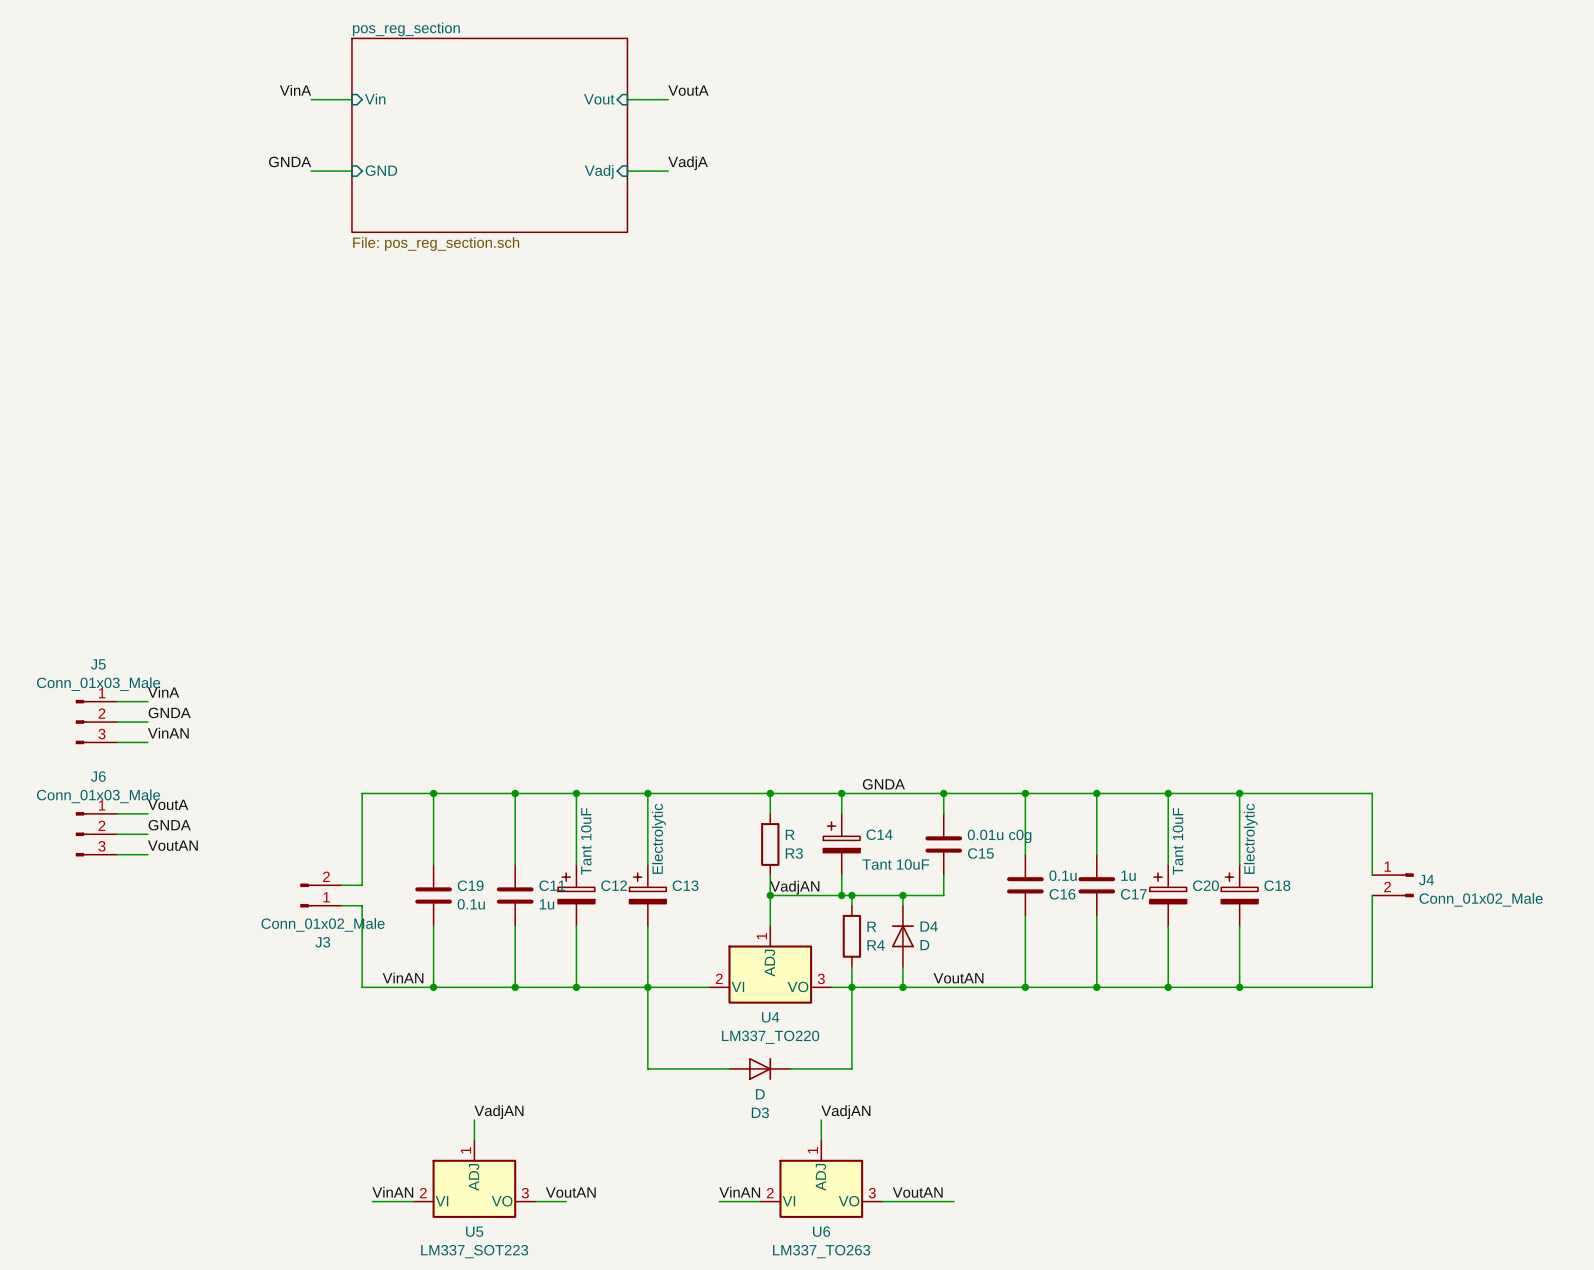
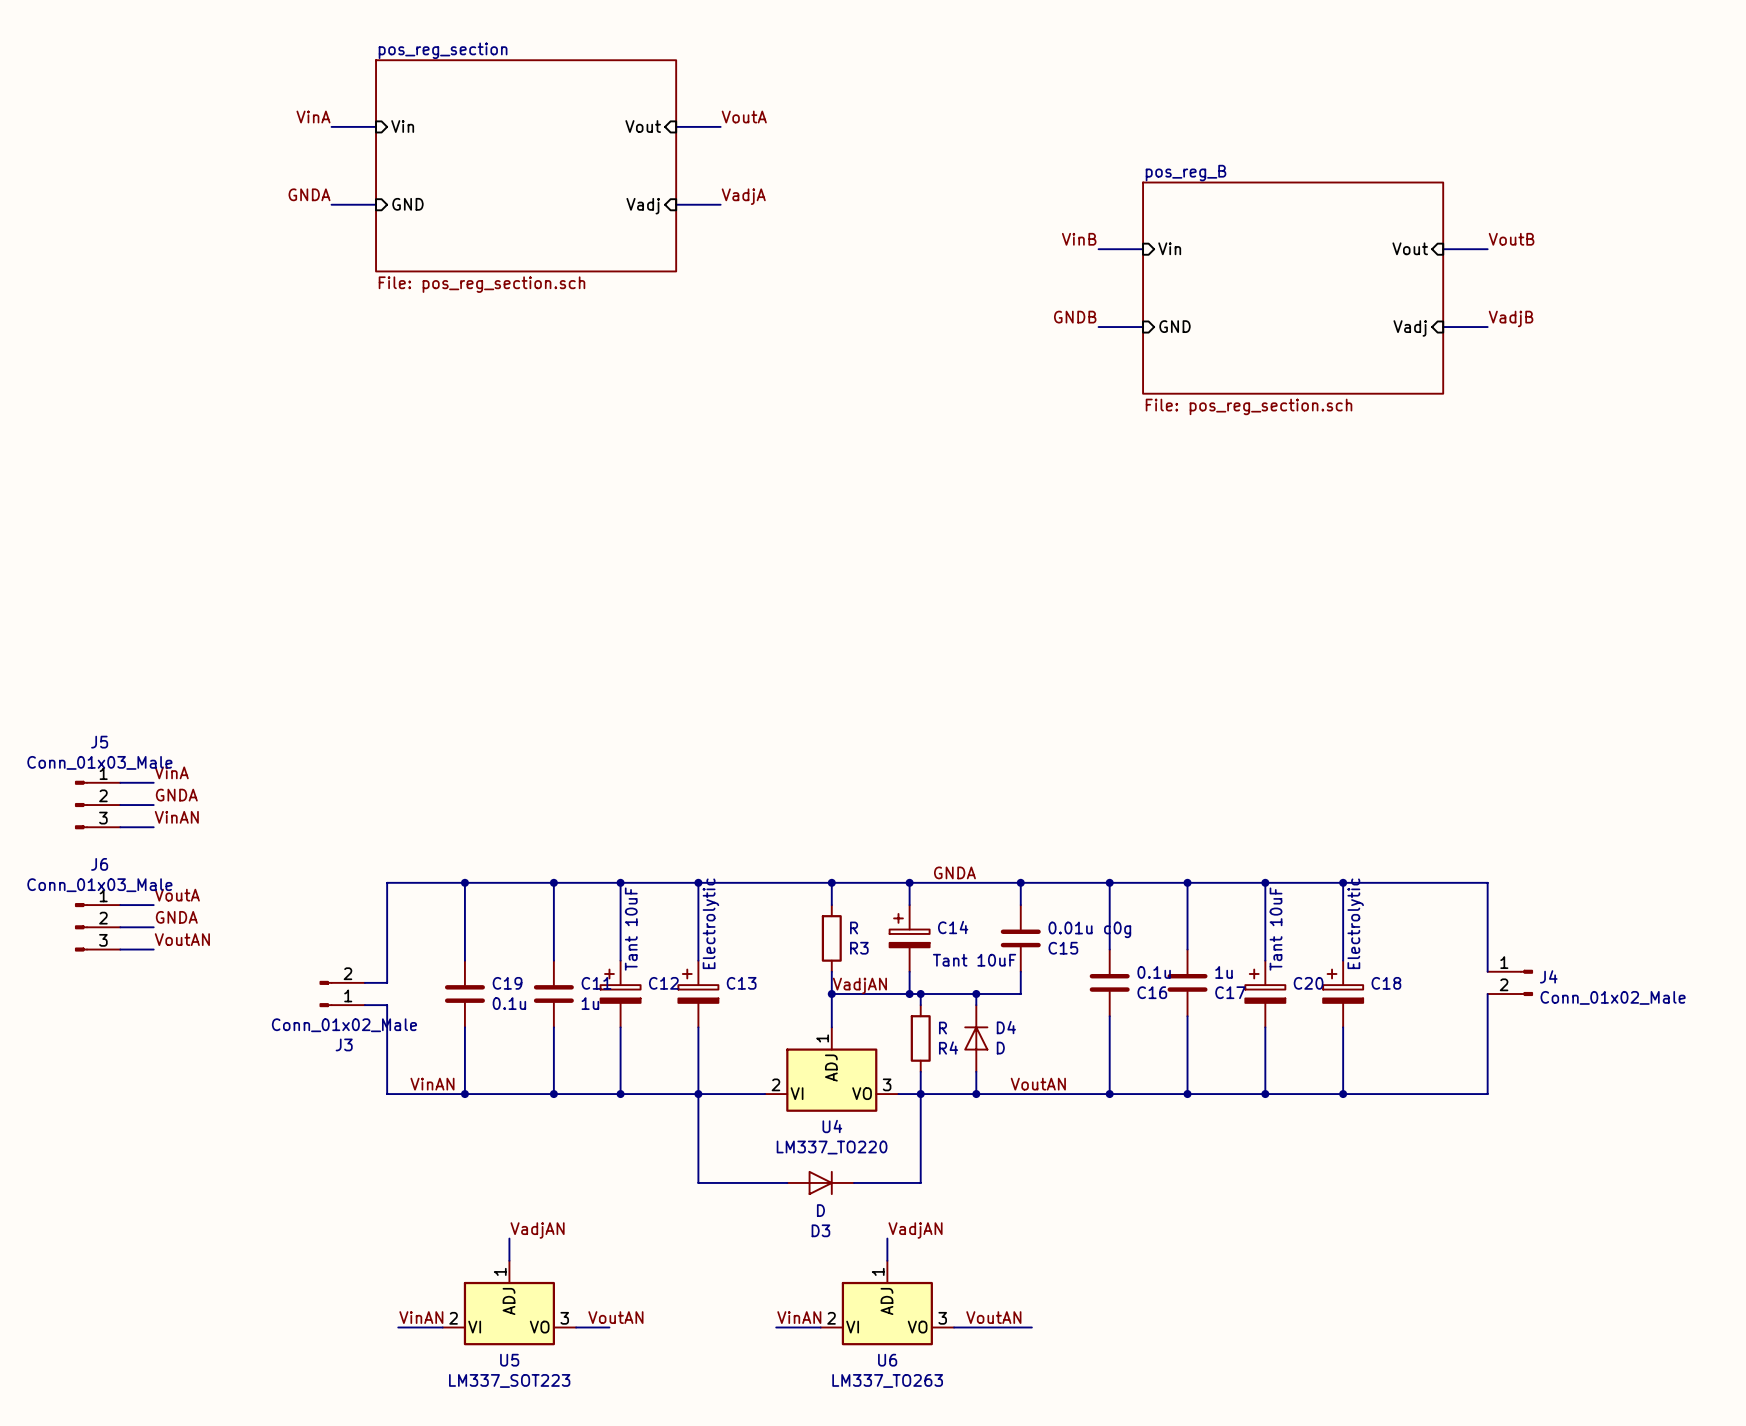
label: none -> VinB (1079, 239)
label: none -> VoutB (1511, 239)
wire: none -> (1098, 249) (1143, 249)
sheet pin: none -> Vin (1169, 248)
sheet pin: none -> Vout (1410, 248)
wire: none -> (1443, 249) (1487, 249)
sheet pos_reg_B: none -> File: pos_reg_section.sch (1293, 288)
label: none -> GNDB (1075, 317)
label: none -> VadjB (1511, 318)
sheet pin: none -> GND (1174, 326)
wire: none -> (1098, 327) (1143, 327)
wire: none -> (1443, 327) (1487, 327)
sheet pin: none -> Vadj (1410, 328)

